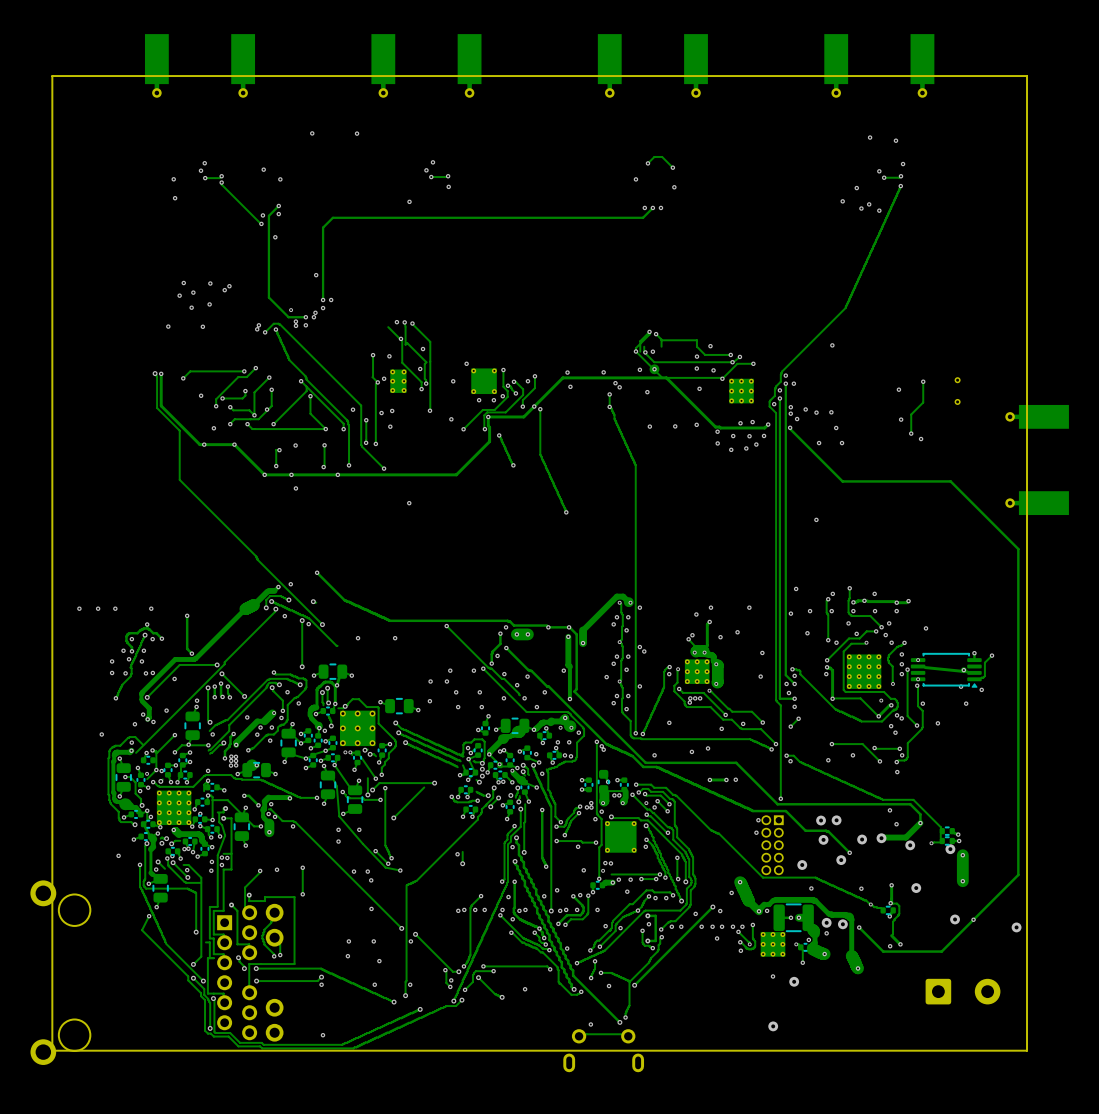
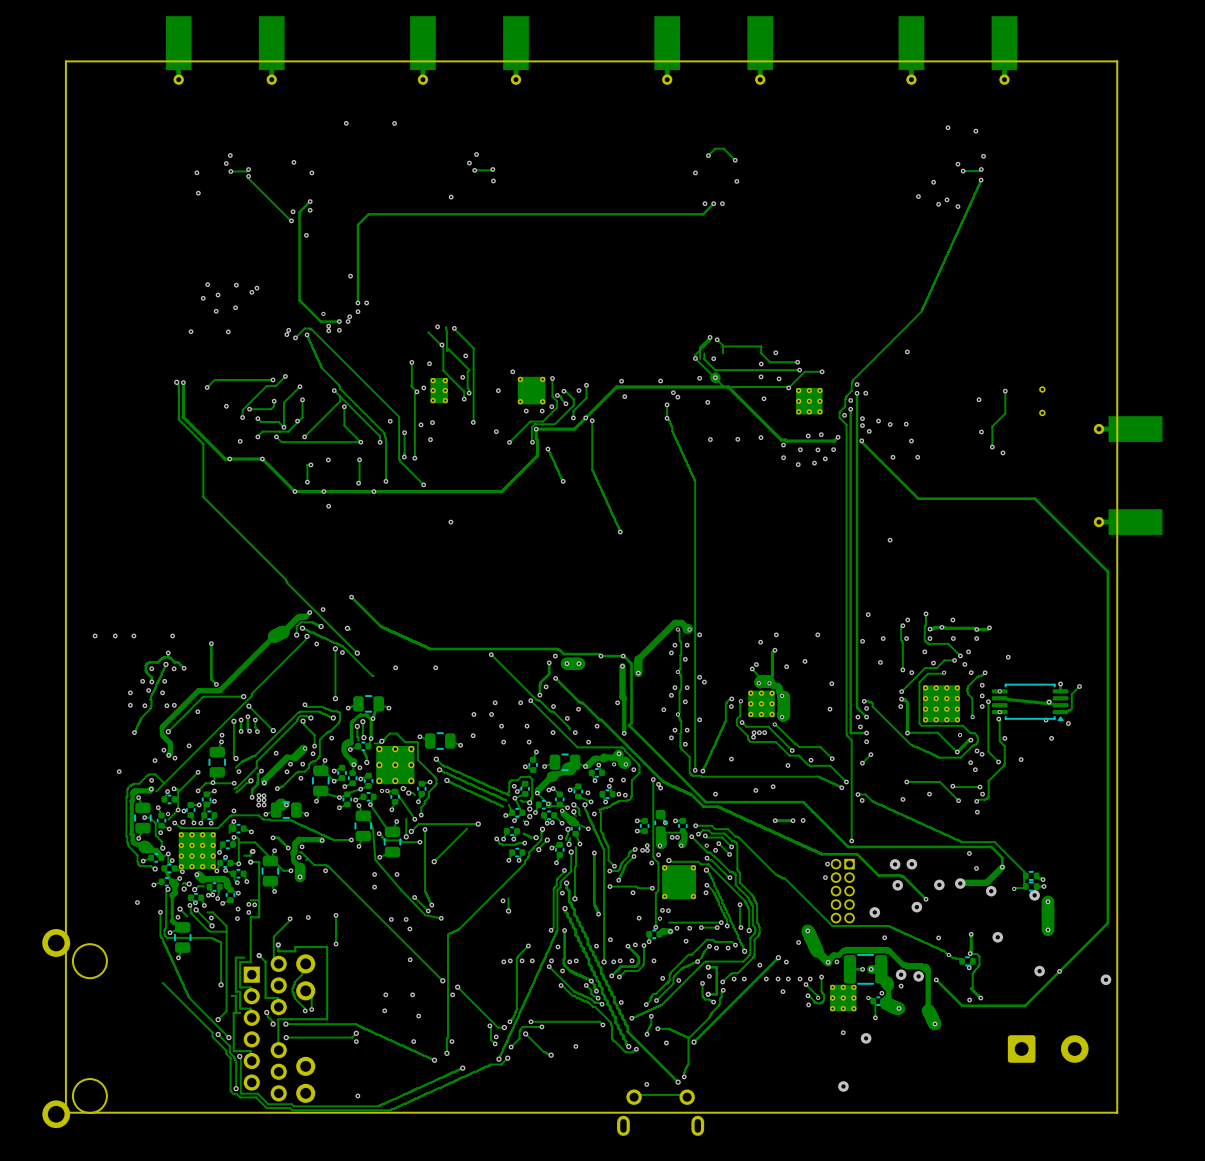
via: (404, 322) -> none
via: (645, 352) -> none
track: (739, 356) (734, 361) -> none
via: (739, 356) -> none
via: (287, 692) -> none
track: (219, 812) (219, 822) (225, 835) (217, 855) (217, 906) -> none
via: (275, 816) -> none
track: (149, 916) (142, 929) -> none
via: (149, 916) -> none

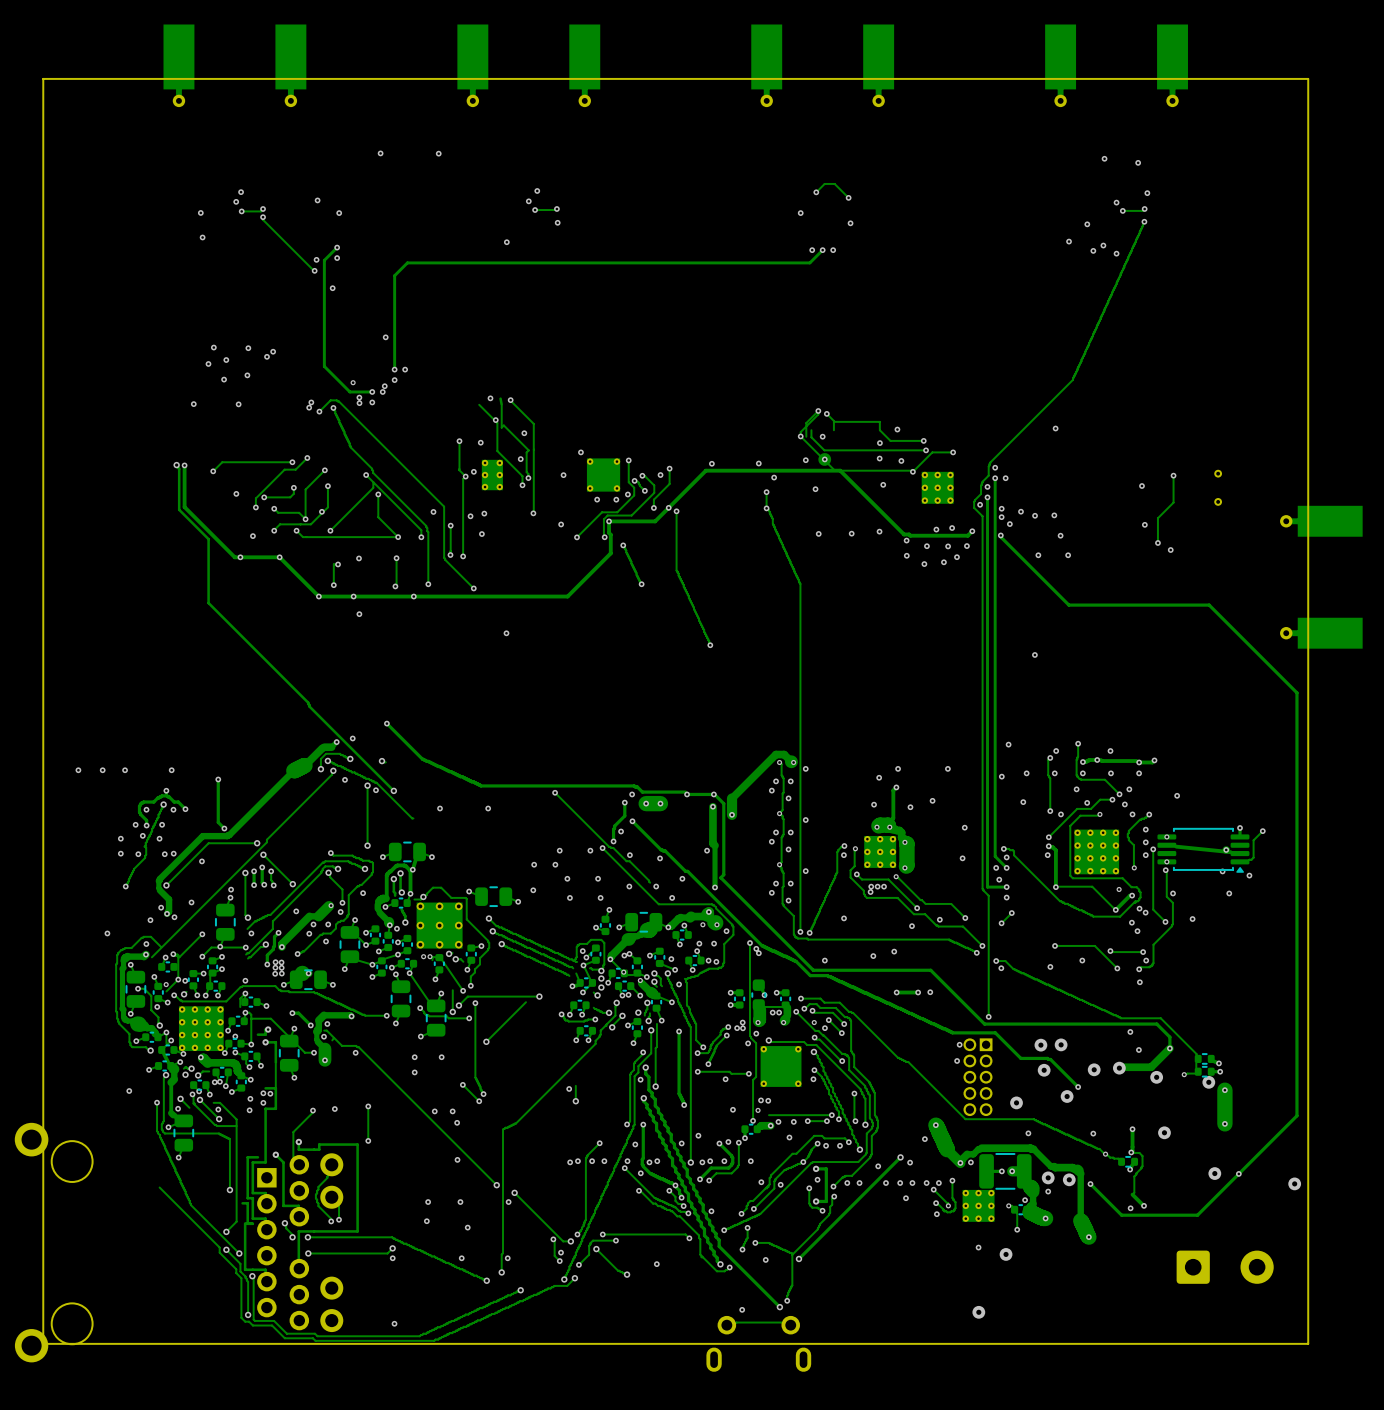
via: (624, 396) -> none
via: (677, 397) -> none
track: (752, 668) (758, 676) -> none
via: (752, 668) -> none
via: (704, 682) -> none
via: (663, 709) -> none
via: (567, 718) -> none
track: (369, 820) (372, 827) (375, 859) (425, 915) (441, 918) -> none
via: (441, 918) -> none

